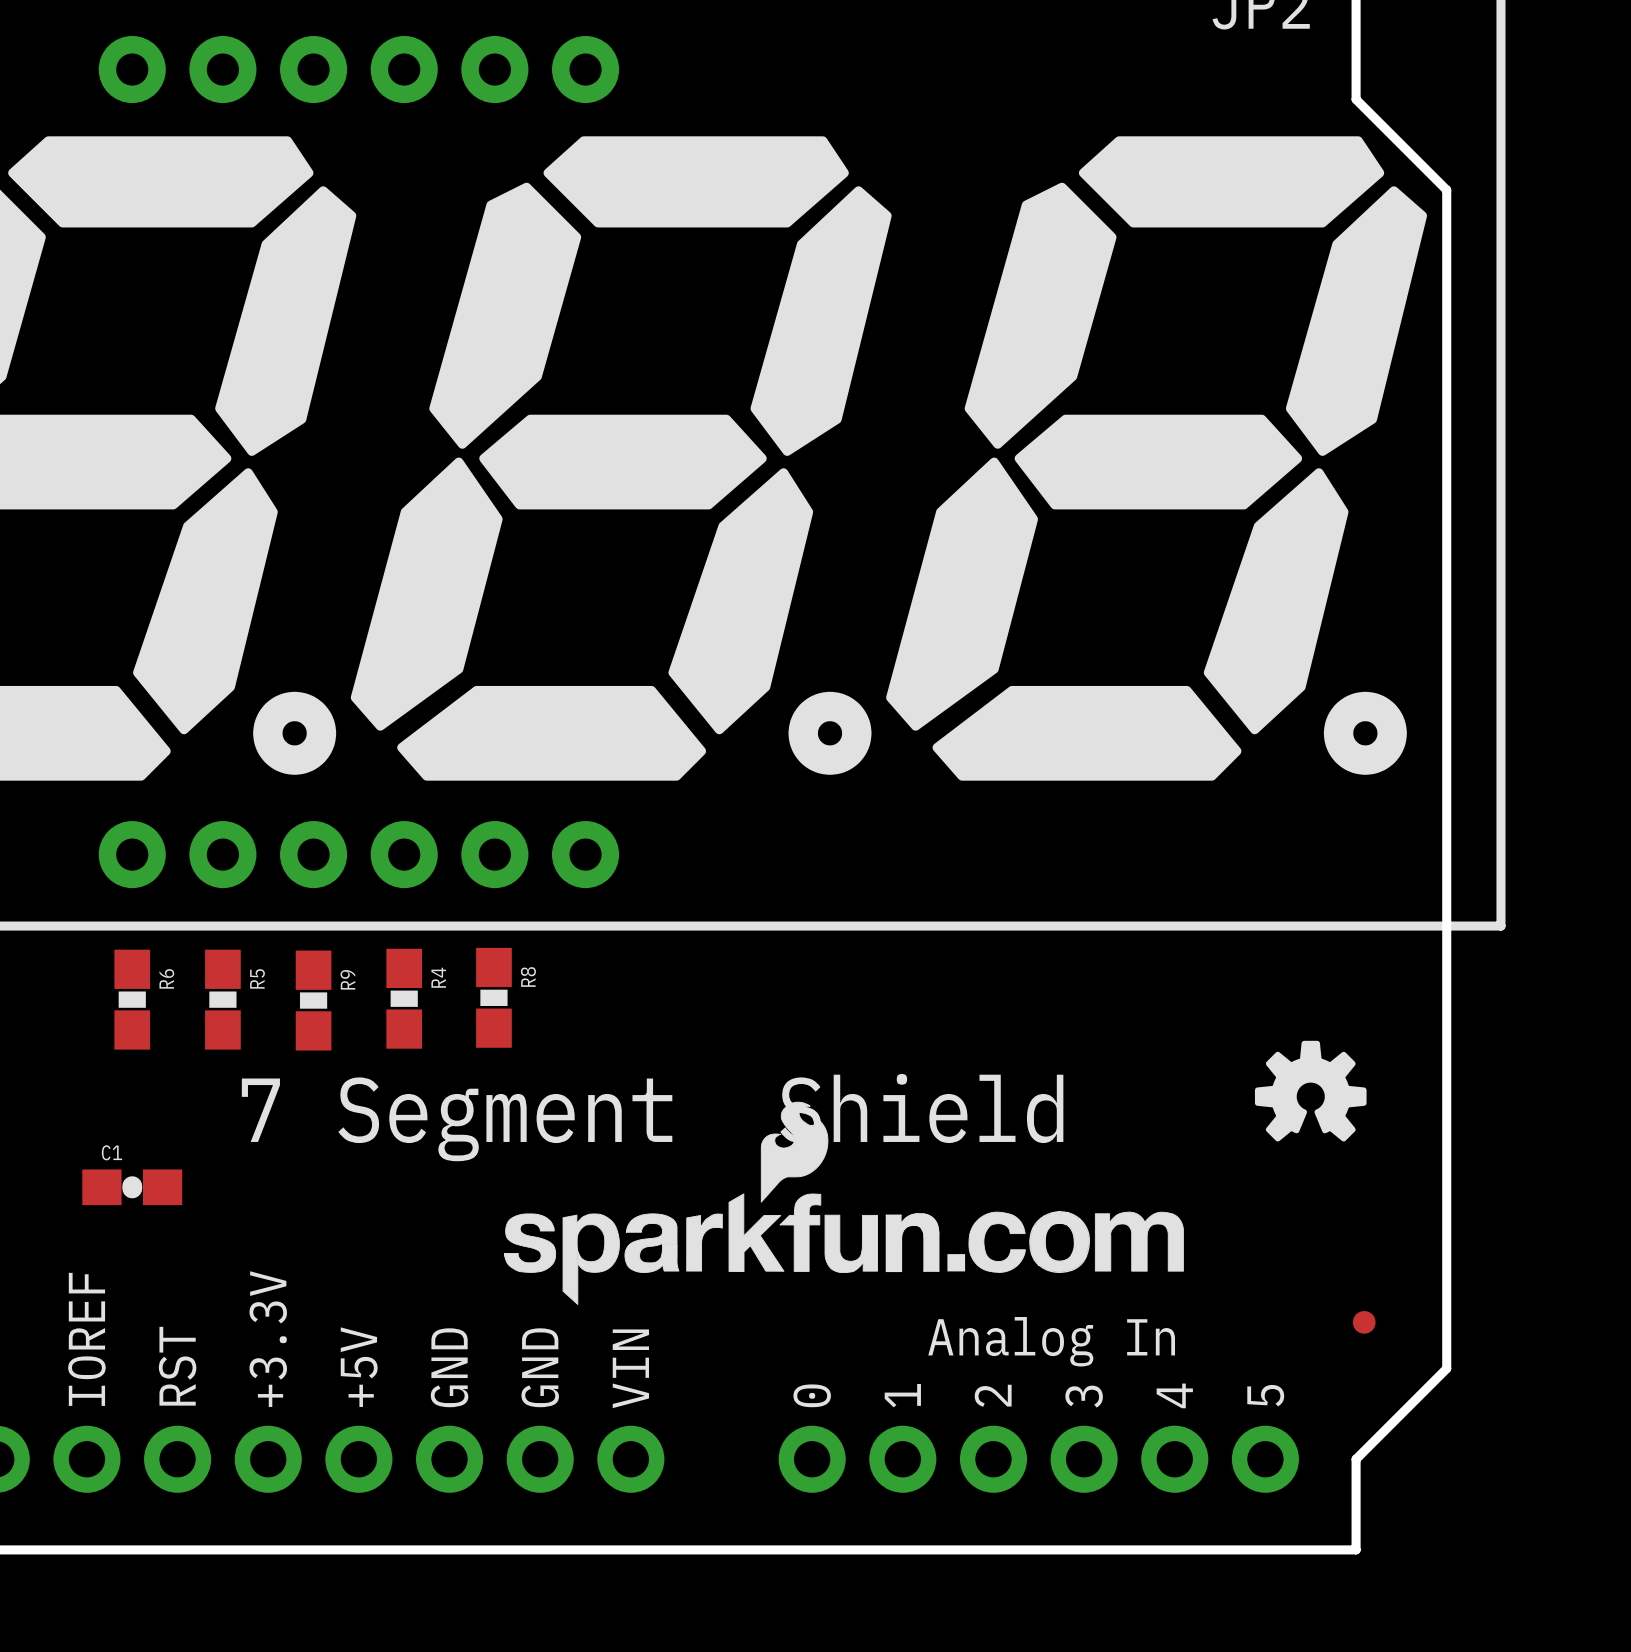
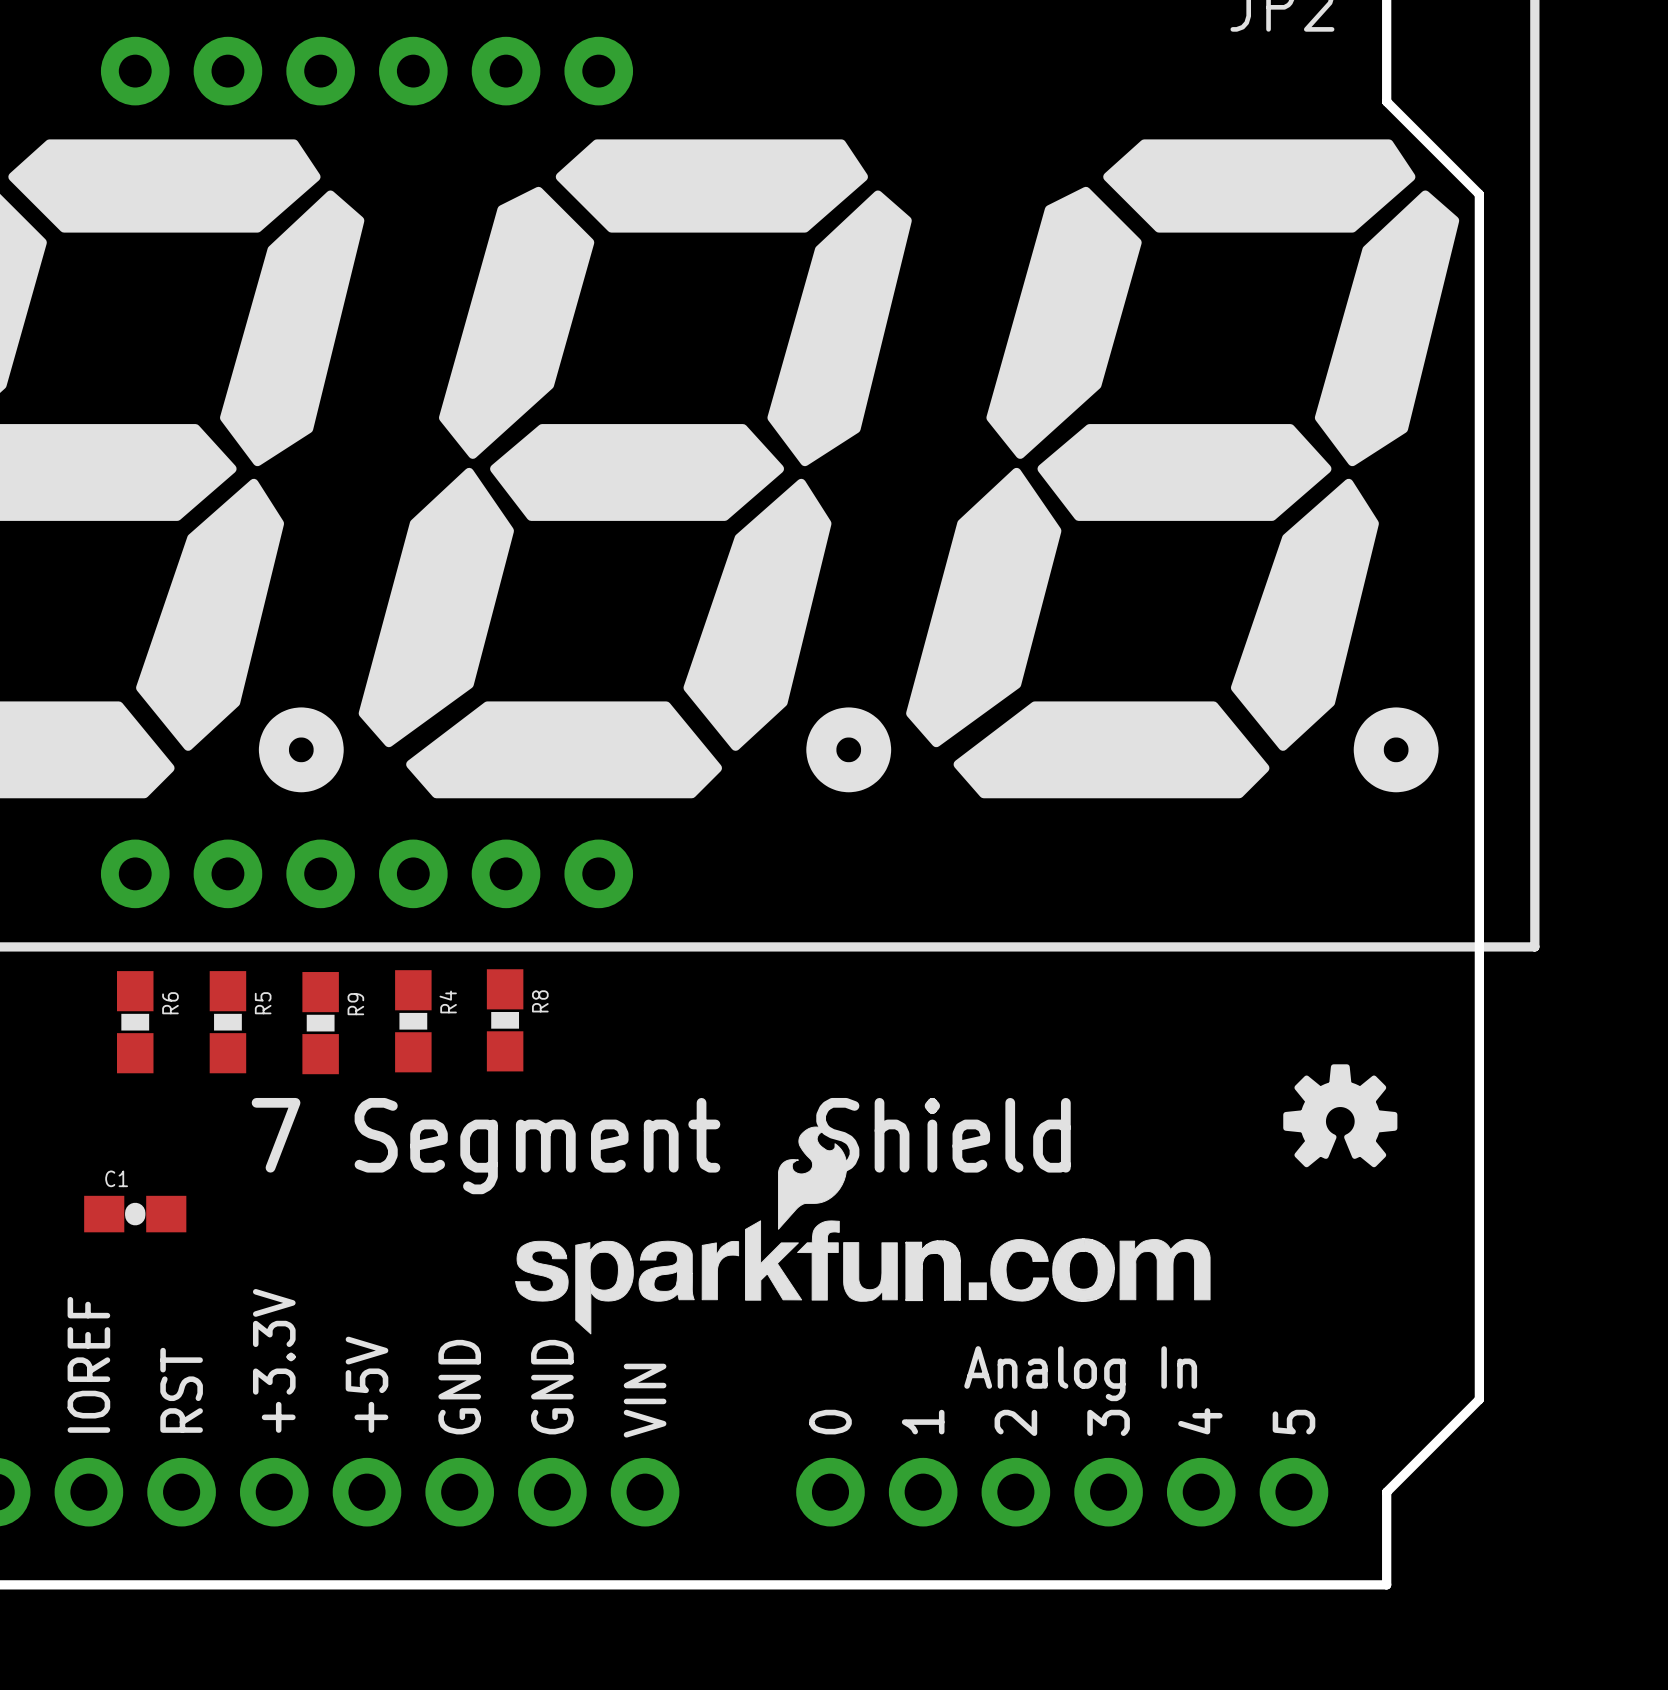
part: (1364, 1322) -> none

